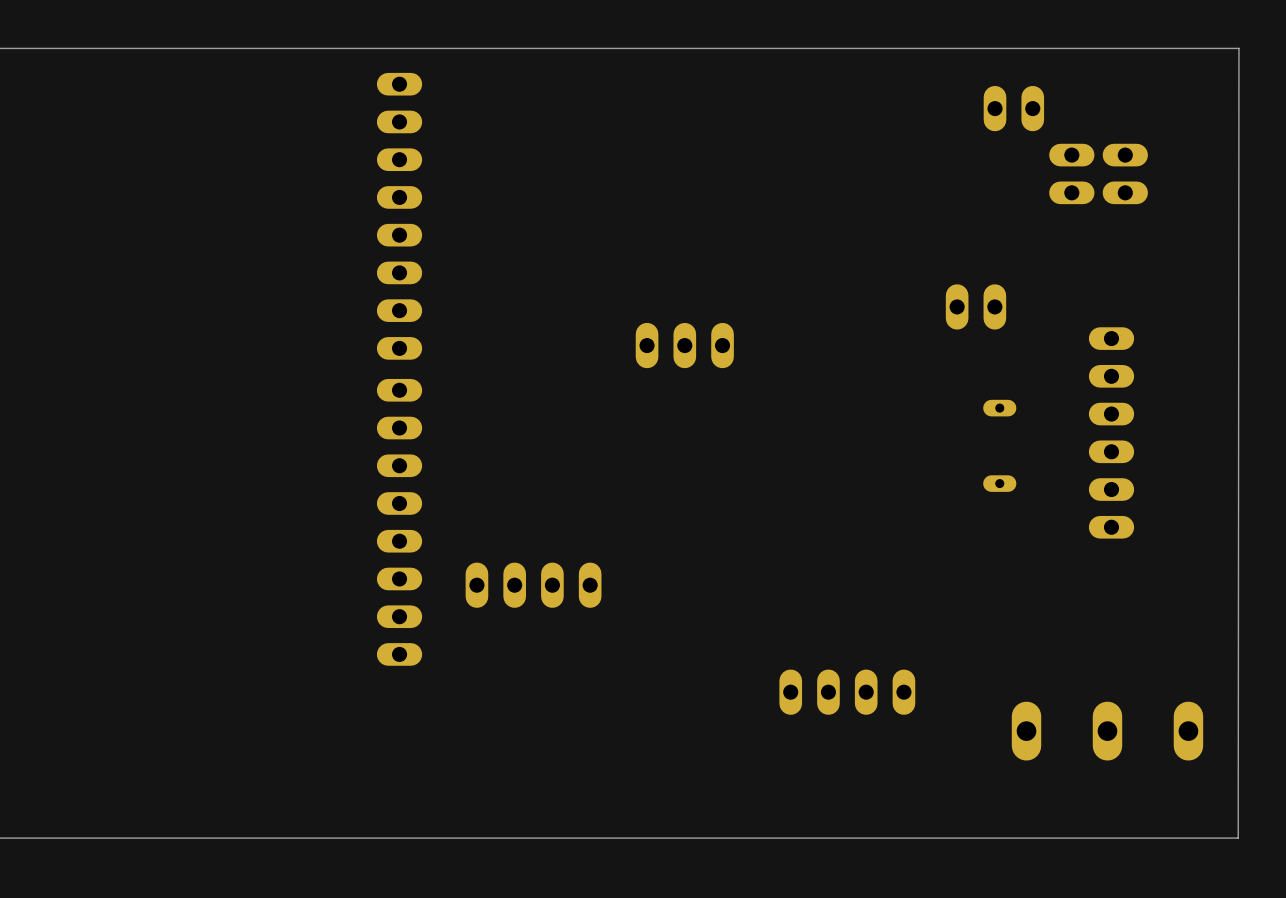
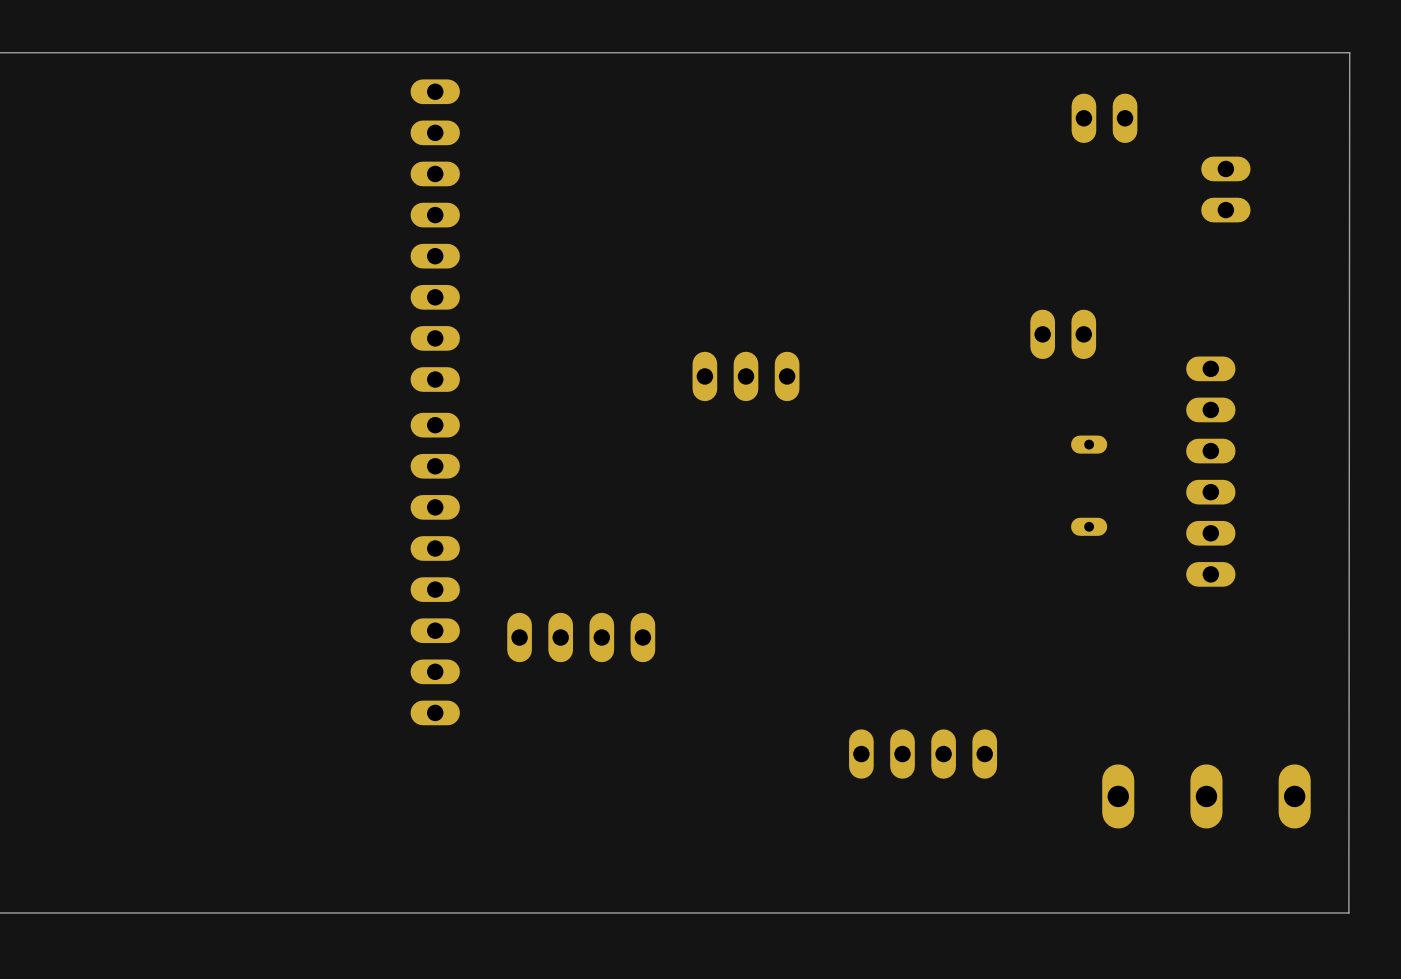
part: (1071, 173) -> none

